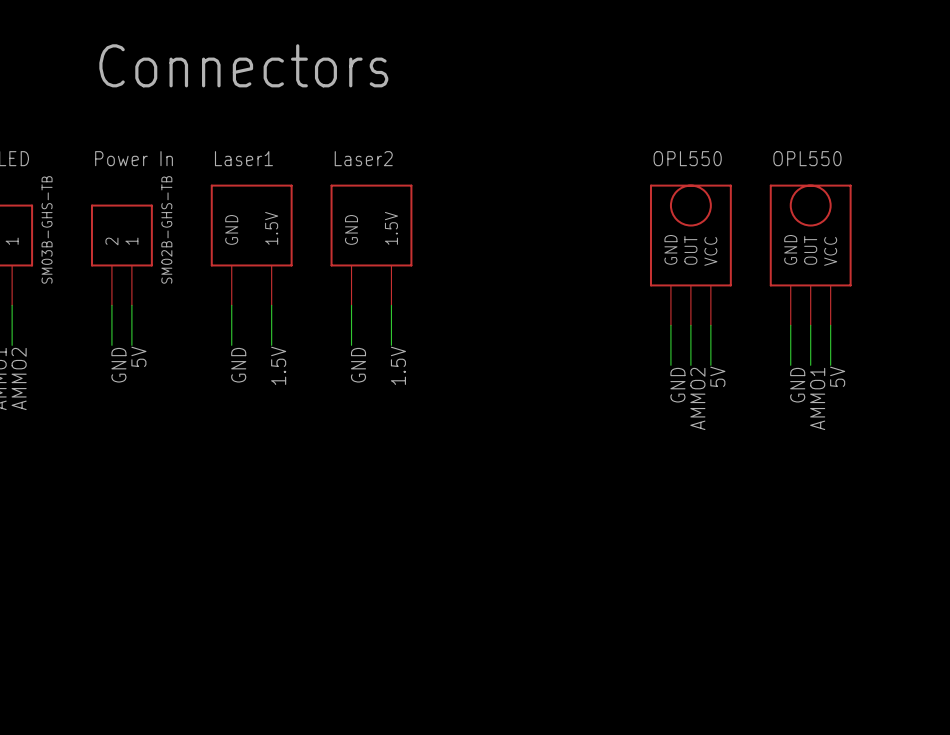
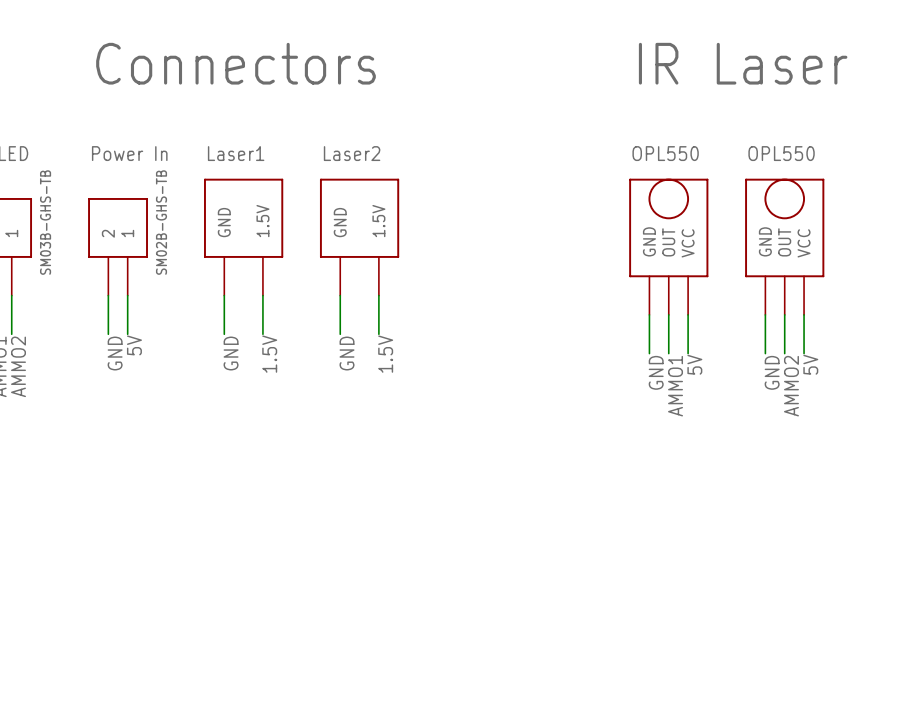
text: none -> IR Laser (743, 63)
label: AMMO2 (697, 398) -> AMMO1 (675, 386)
label: AMMO1 (817, 398) -> AMMO2 (791, 386)

